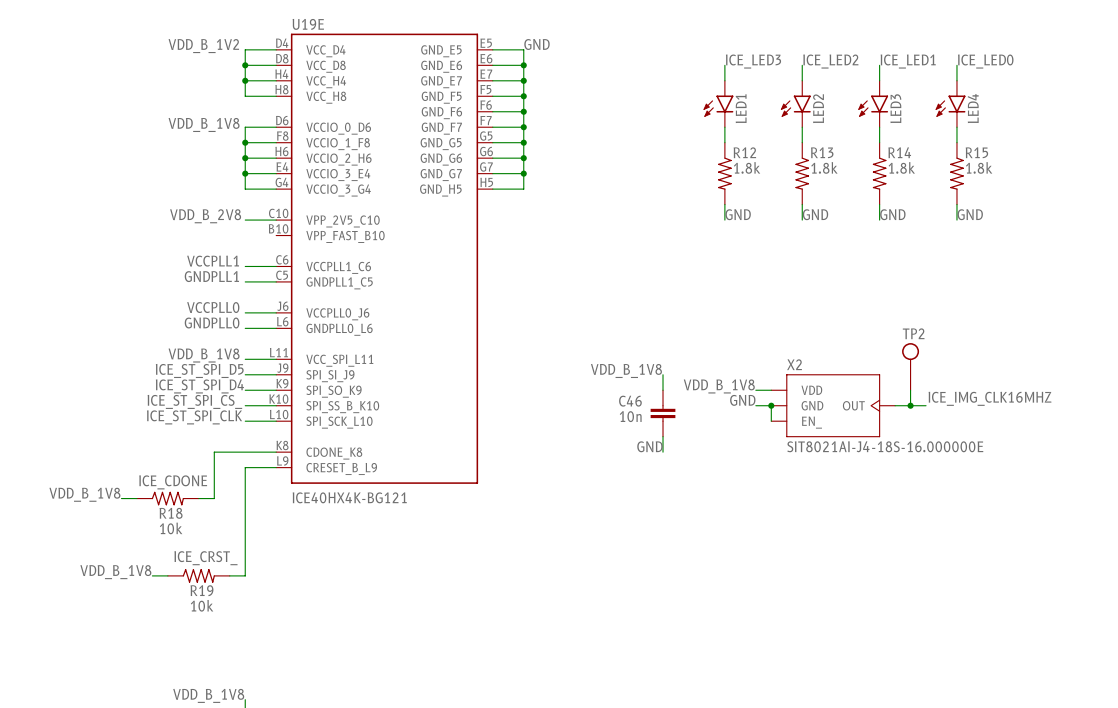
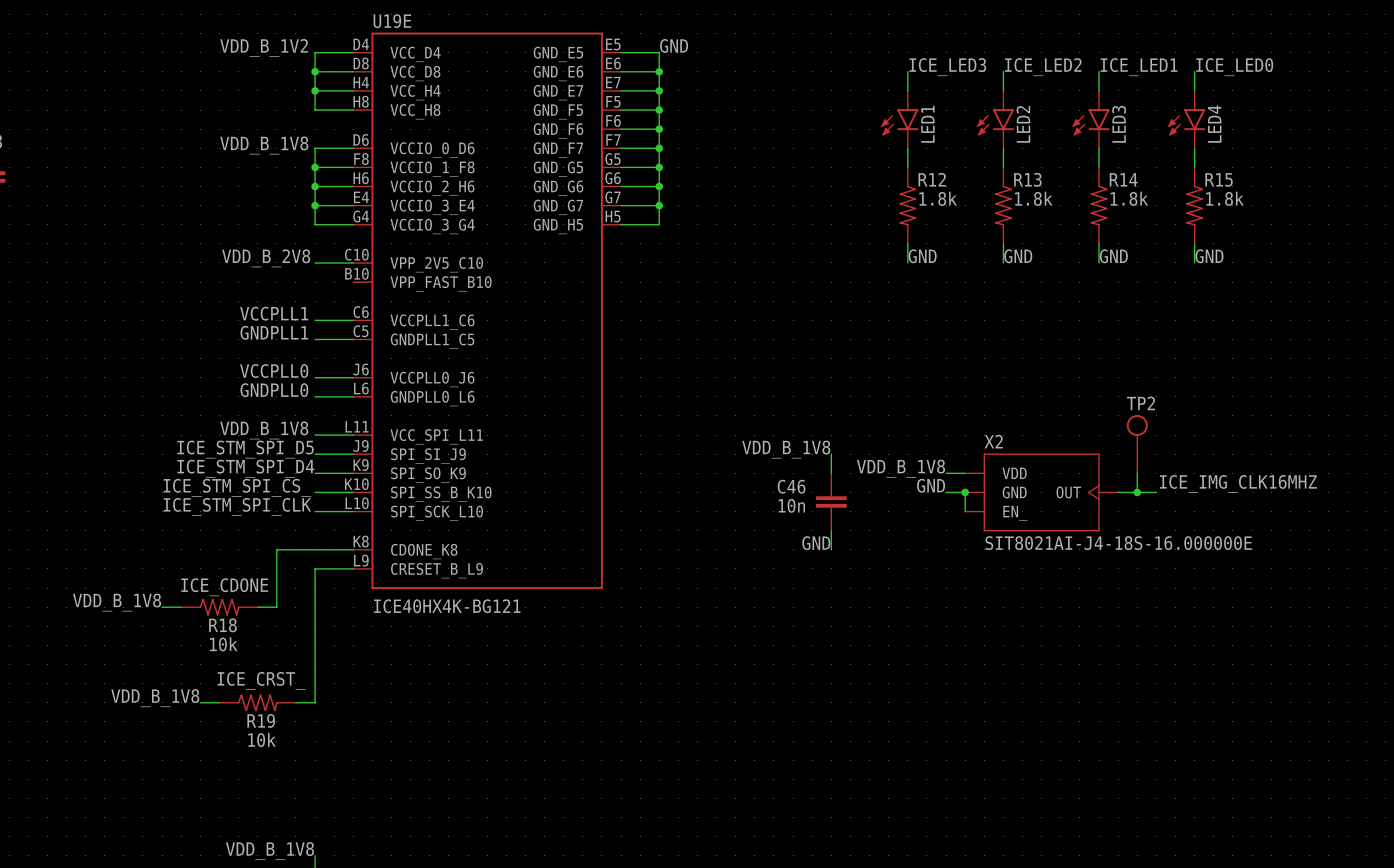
label: ICE_ST_SPI_D5 (199, 370) -> ICE_STM_SPI_D5 (245, 449)
label: ICE_ST_SPI_D4 (199, 386) -> ICE_STM_SPI_D4 (245, 468)
label: ICE_ST_SPI_CS_ (194, 401) -> ICE_STM_SPI_CS_ (237, 487)
label: ICE_ST_SPI_CLK (194, 417) -> ICE_STM_SPI_CLK (237, 506)

